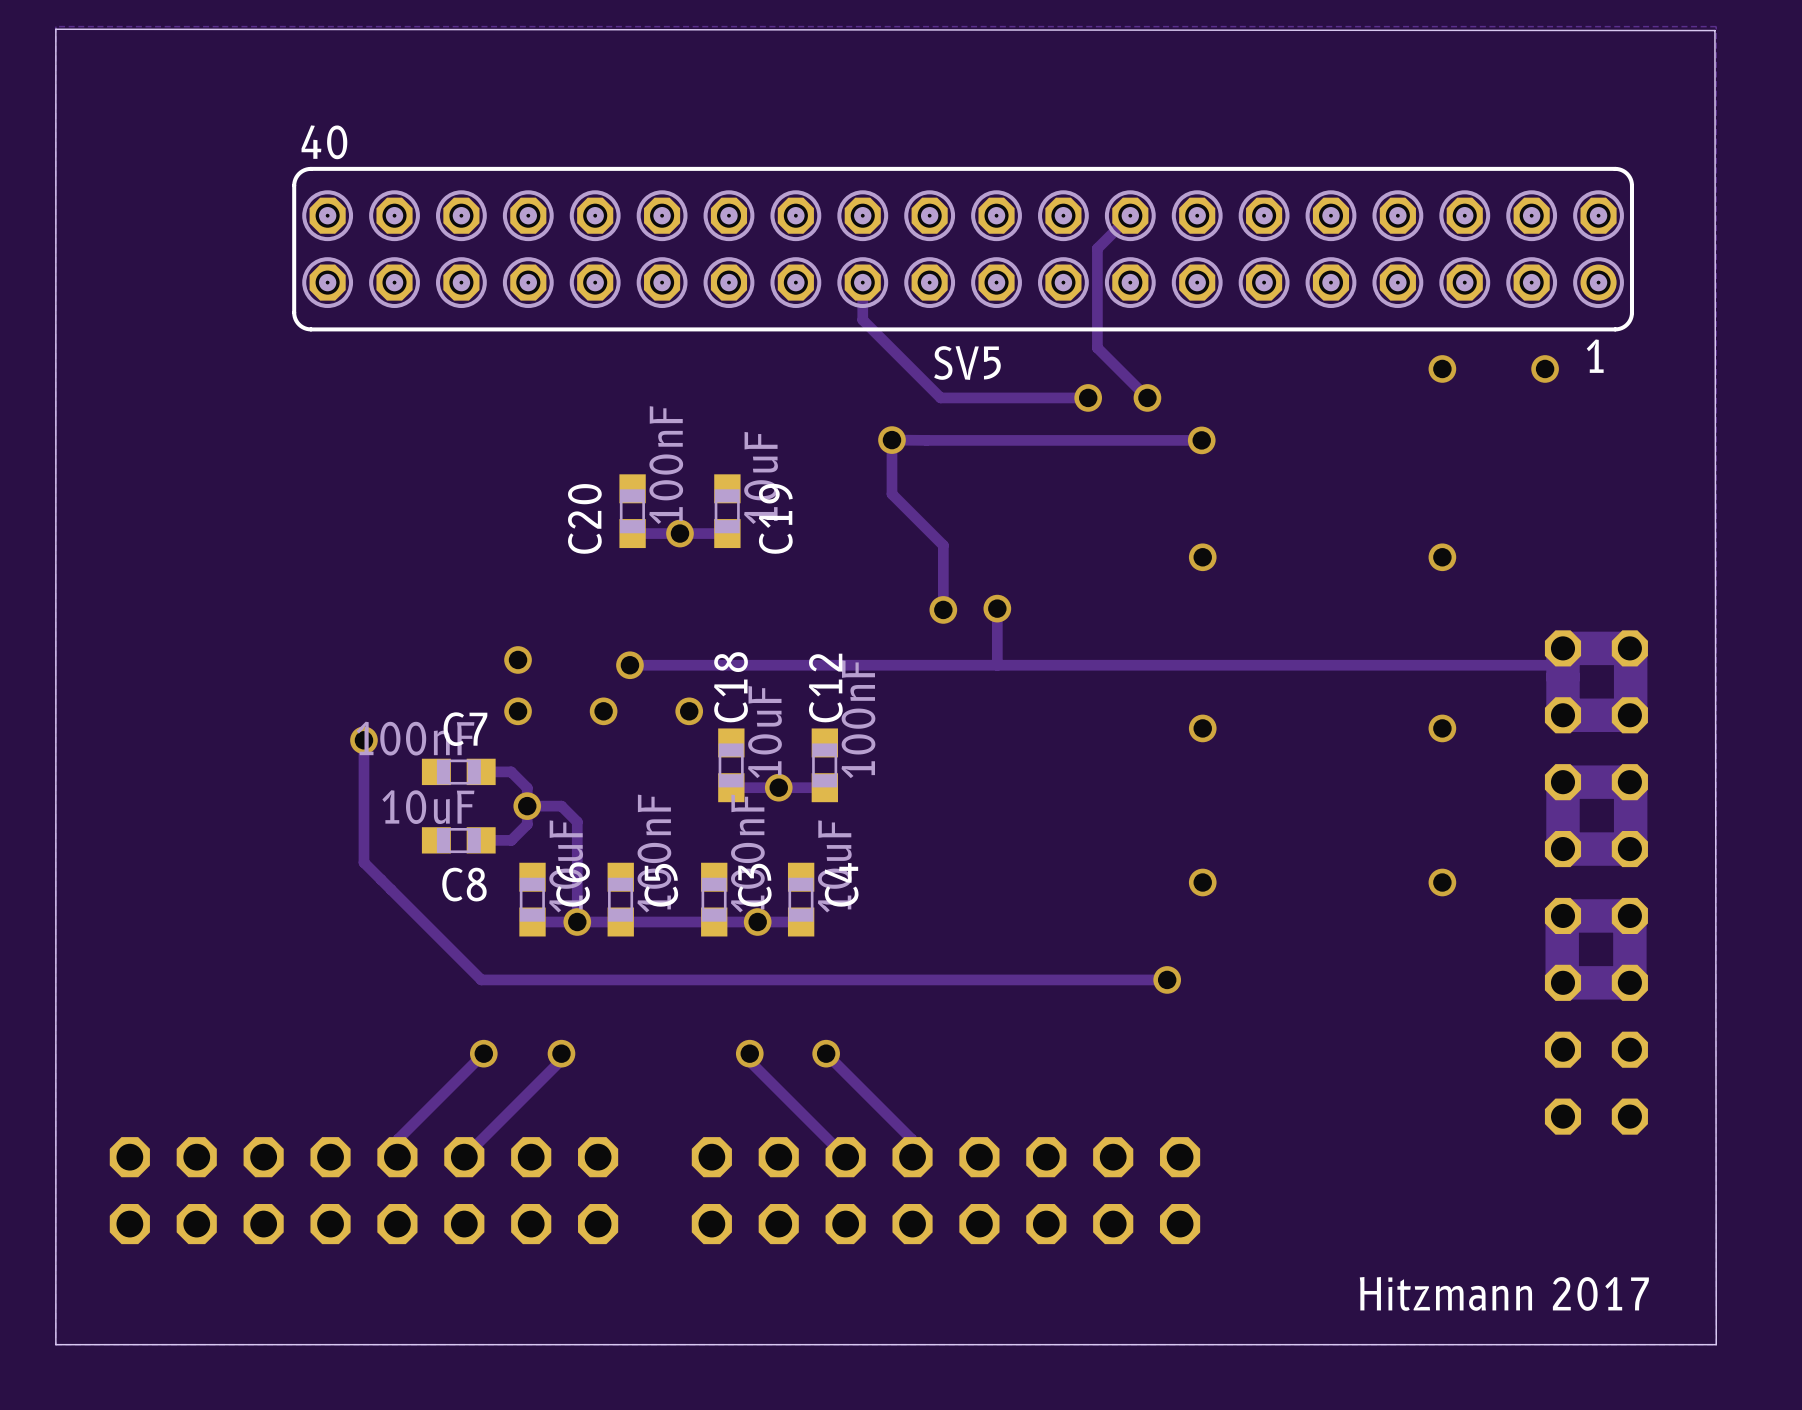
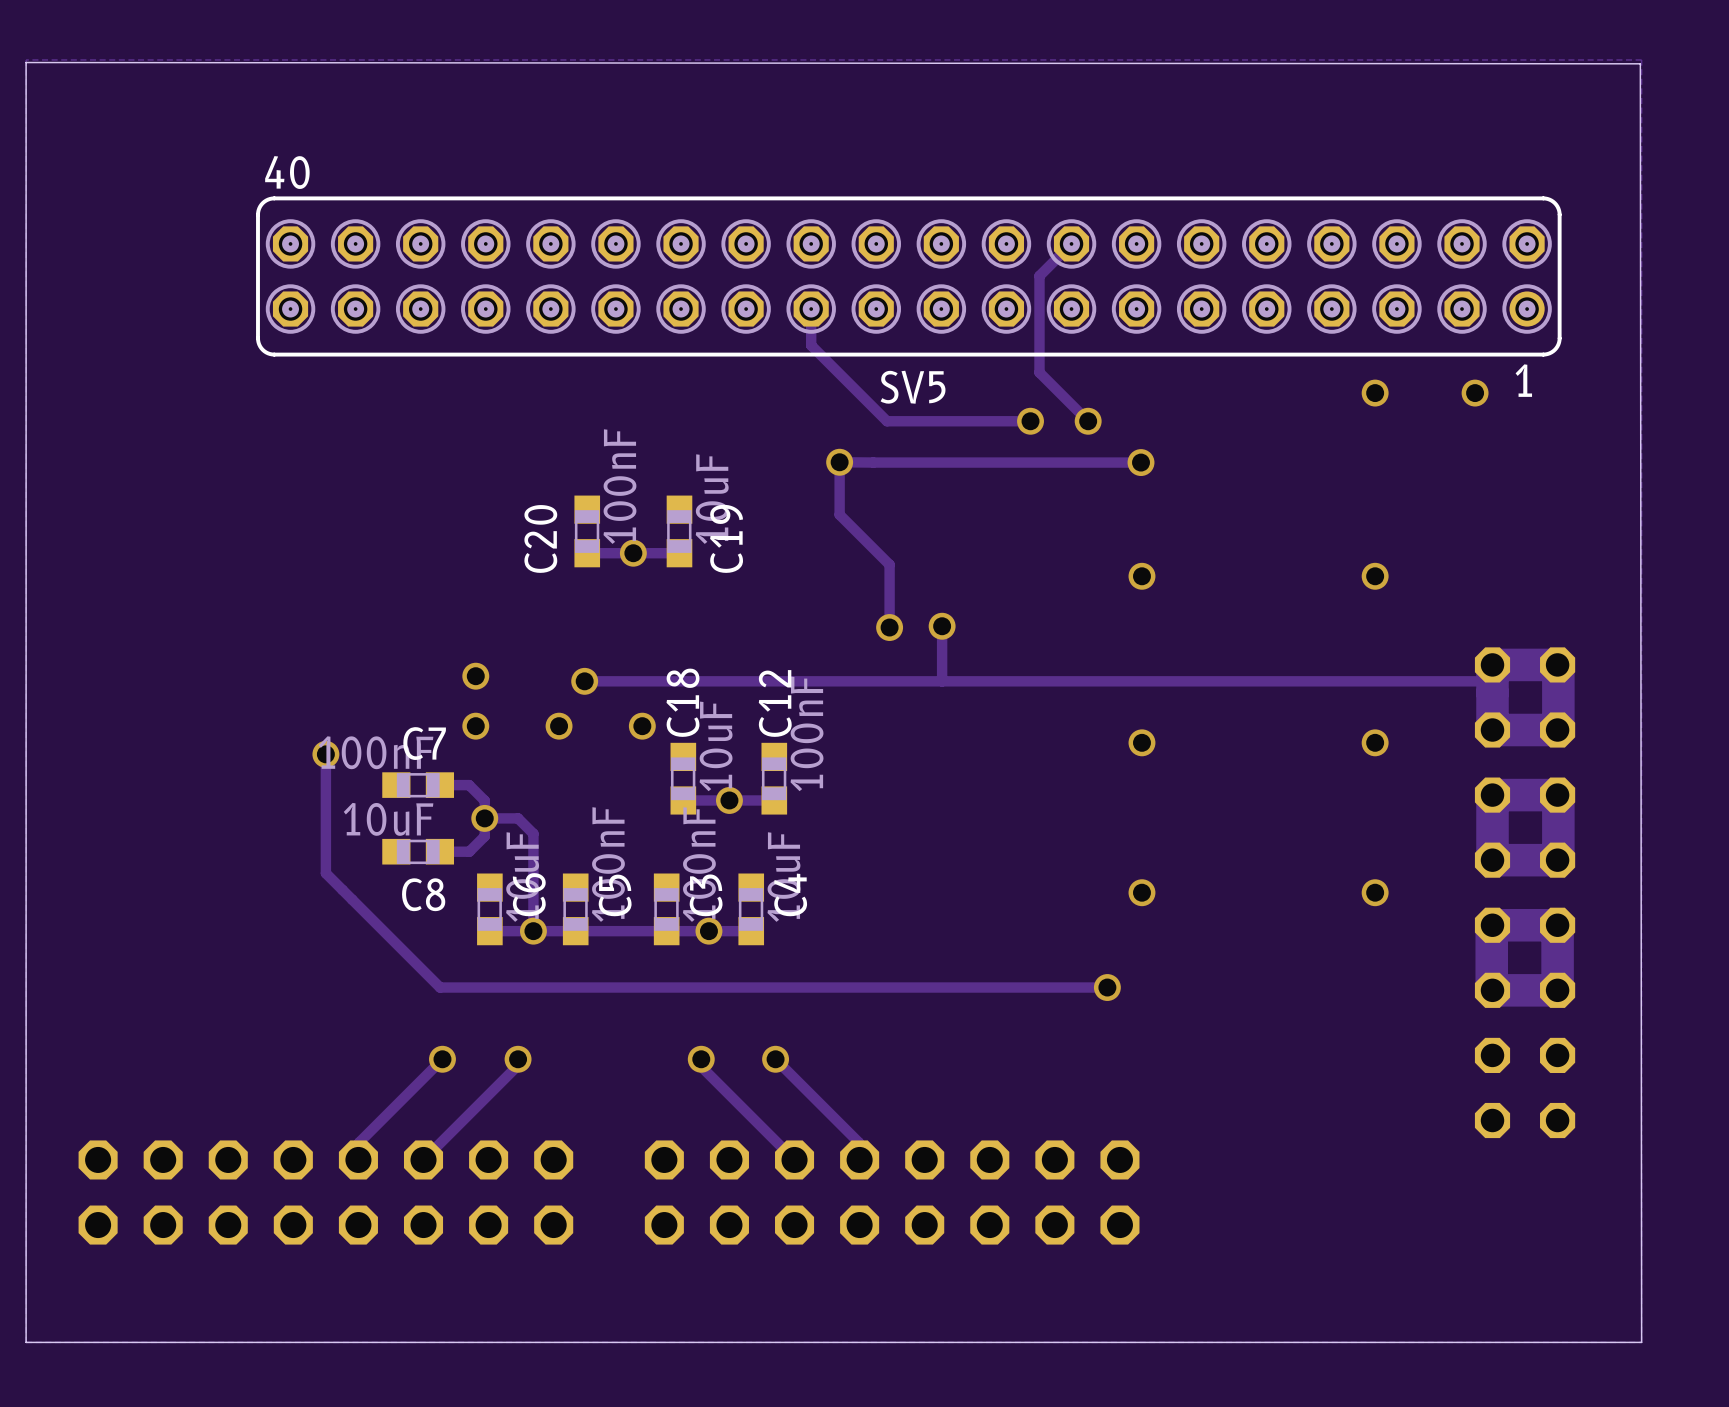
text: Hitzmann 2017 (1504, 1293) -> none

